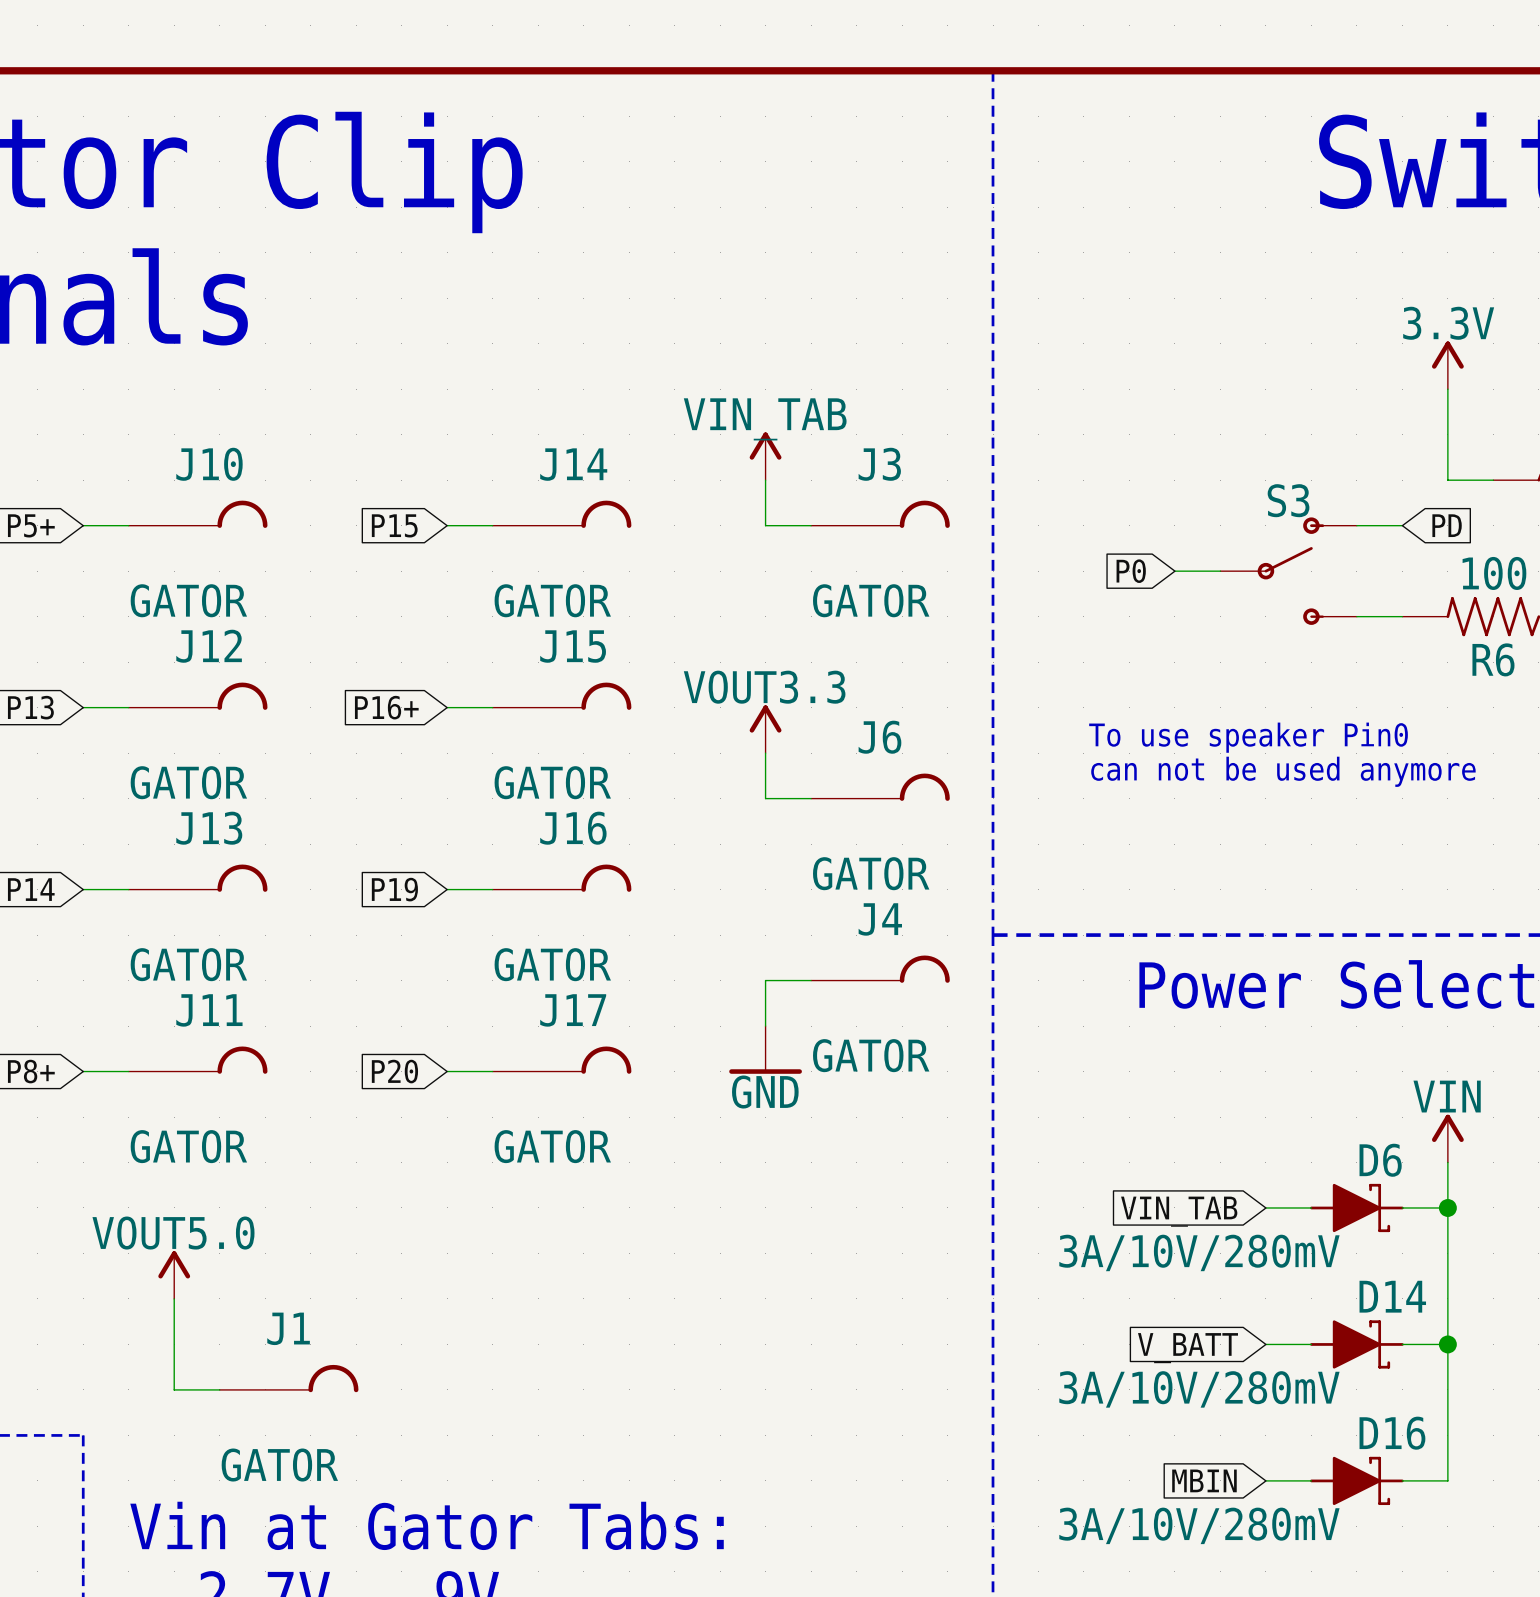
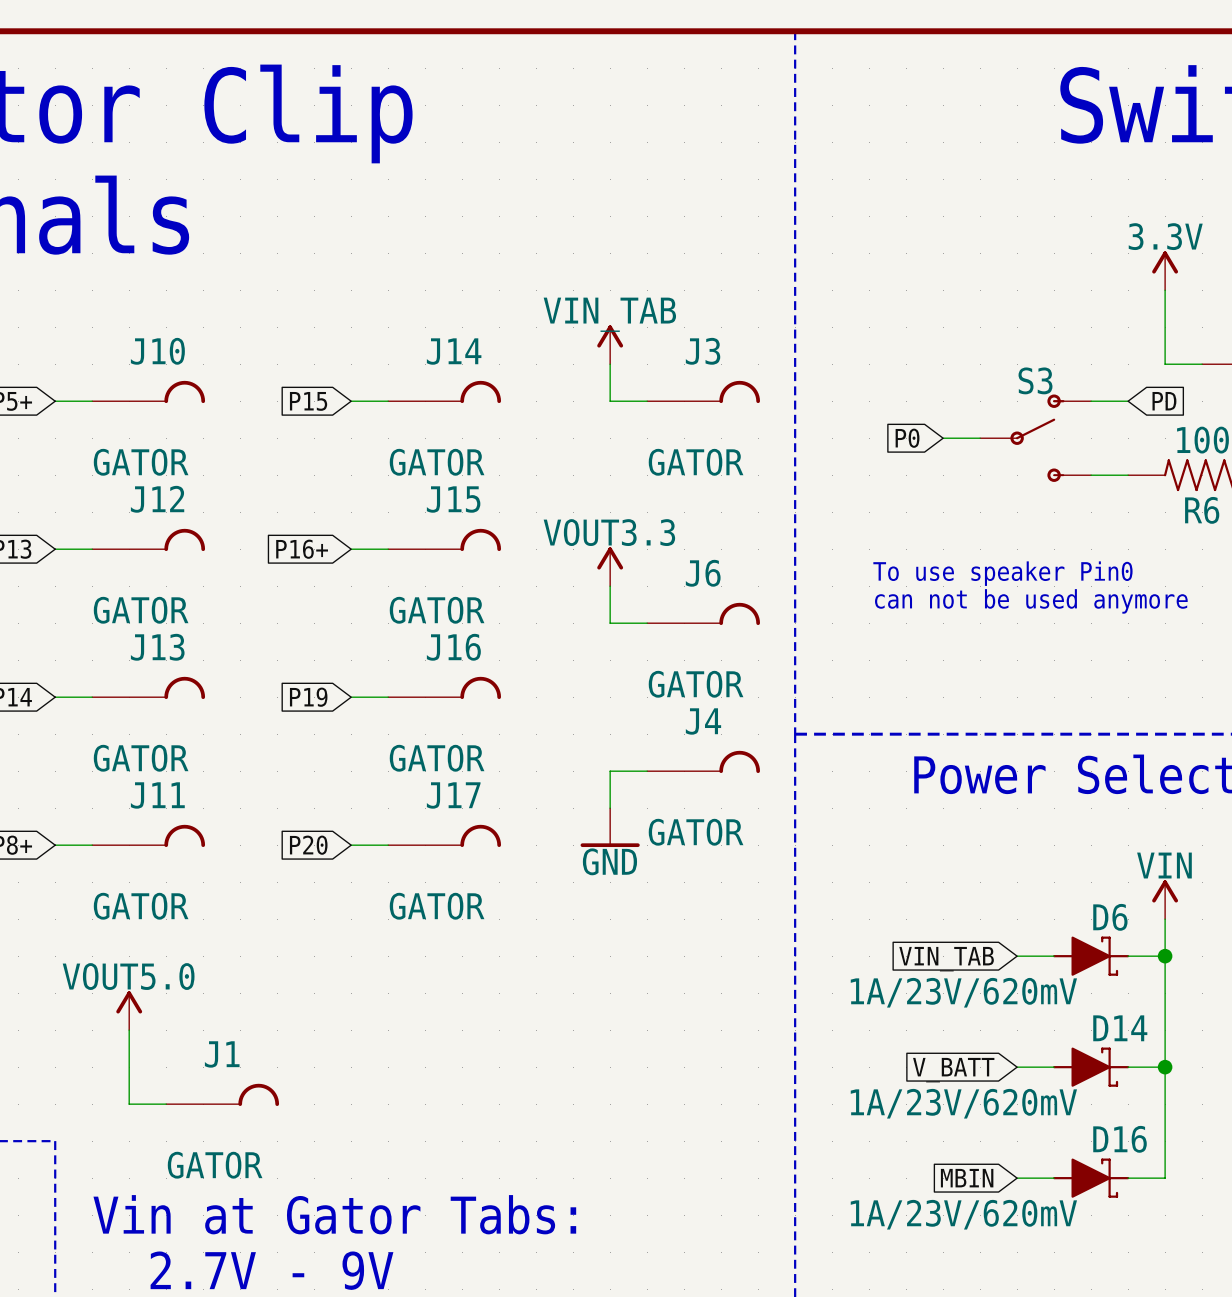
D6 value: 3A/10V/280mV (1199, 1252) -> 1A/23V/620mV (963, 992)
D14 value: 3A/10V/280mV (1199, 1389) -> 1A/23V/620mV (963, 1103)
D16 value: 3A/10V/280mV (1199, 1525) -> 1A/23V/620mV (963, 1214)

